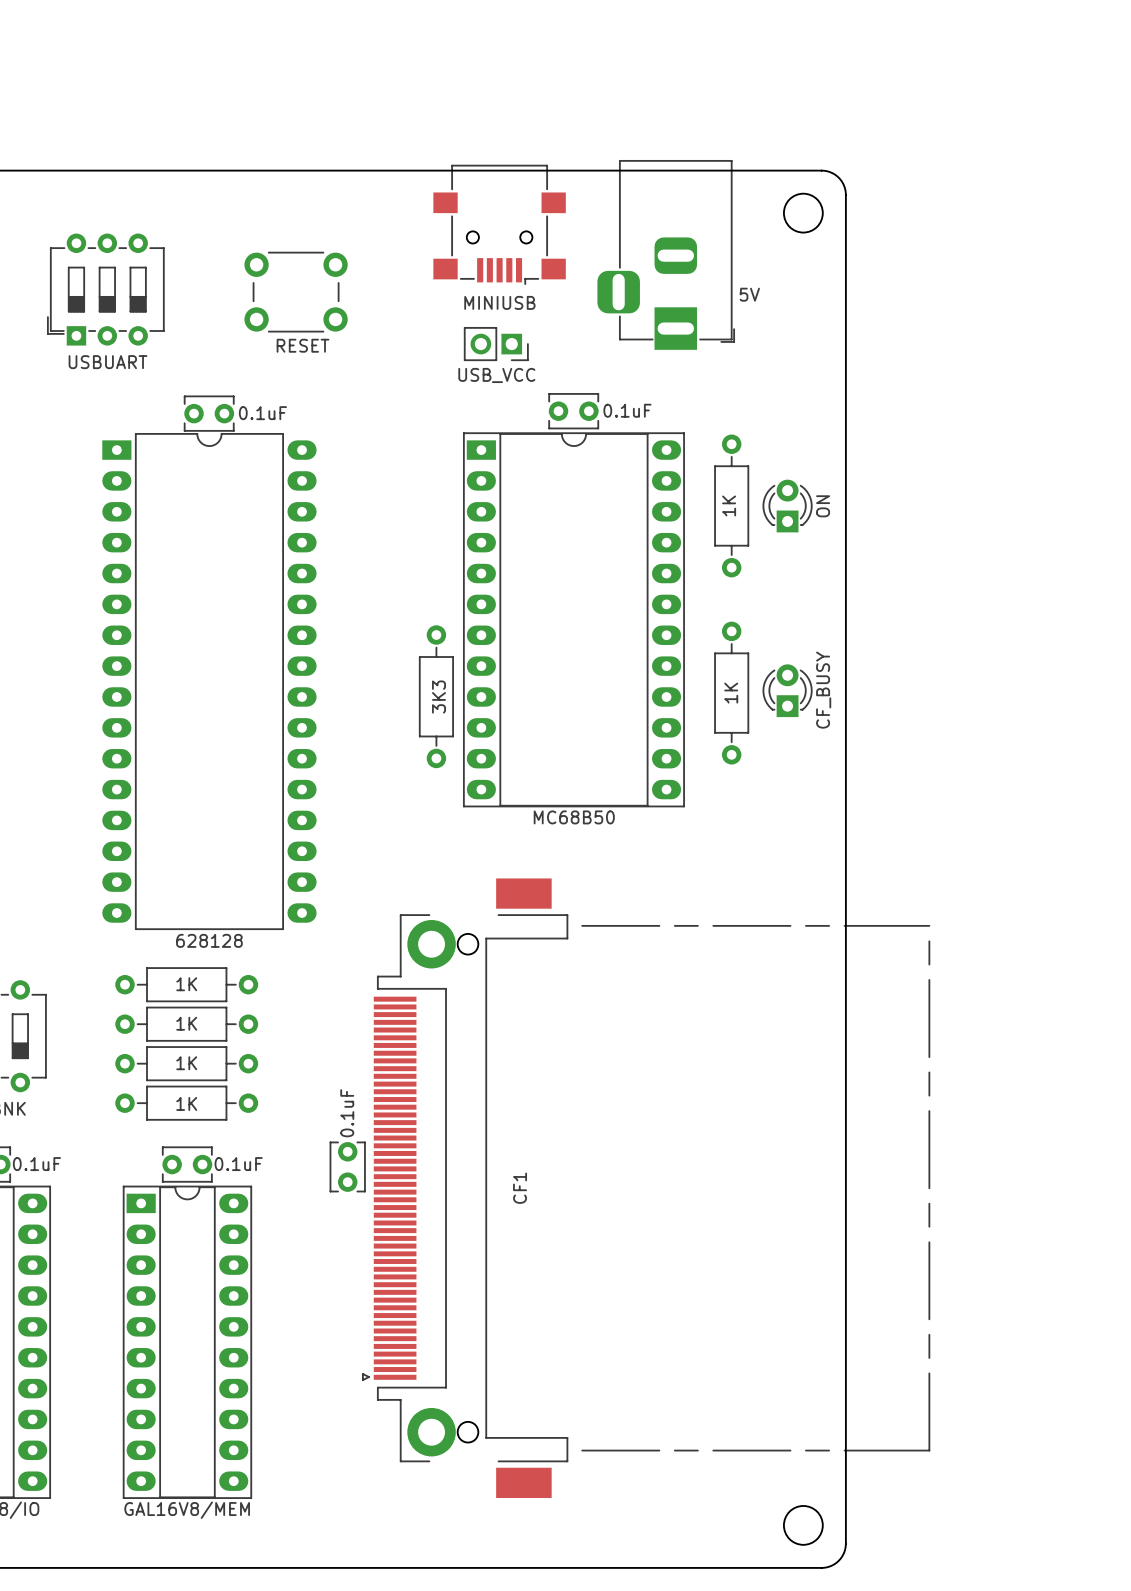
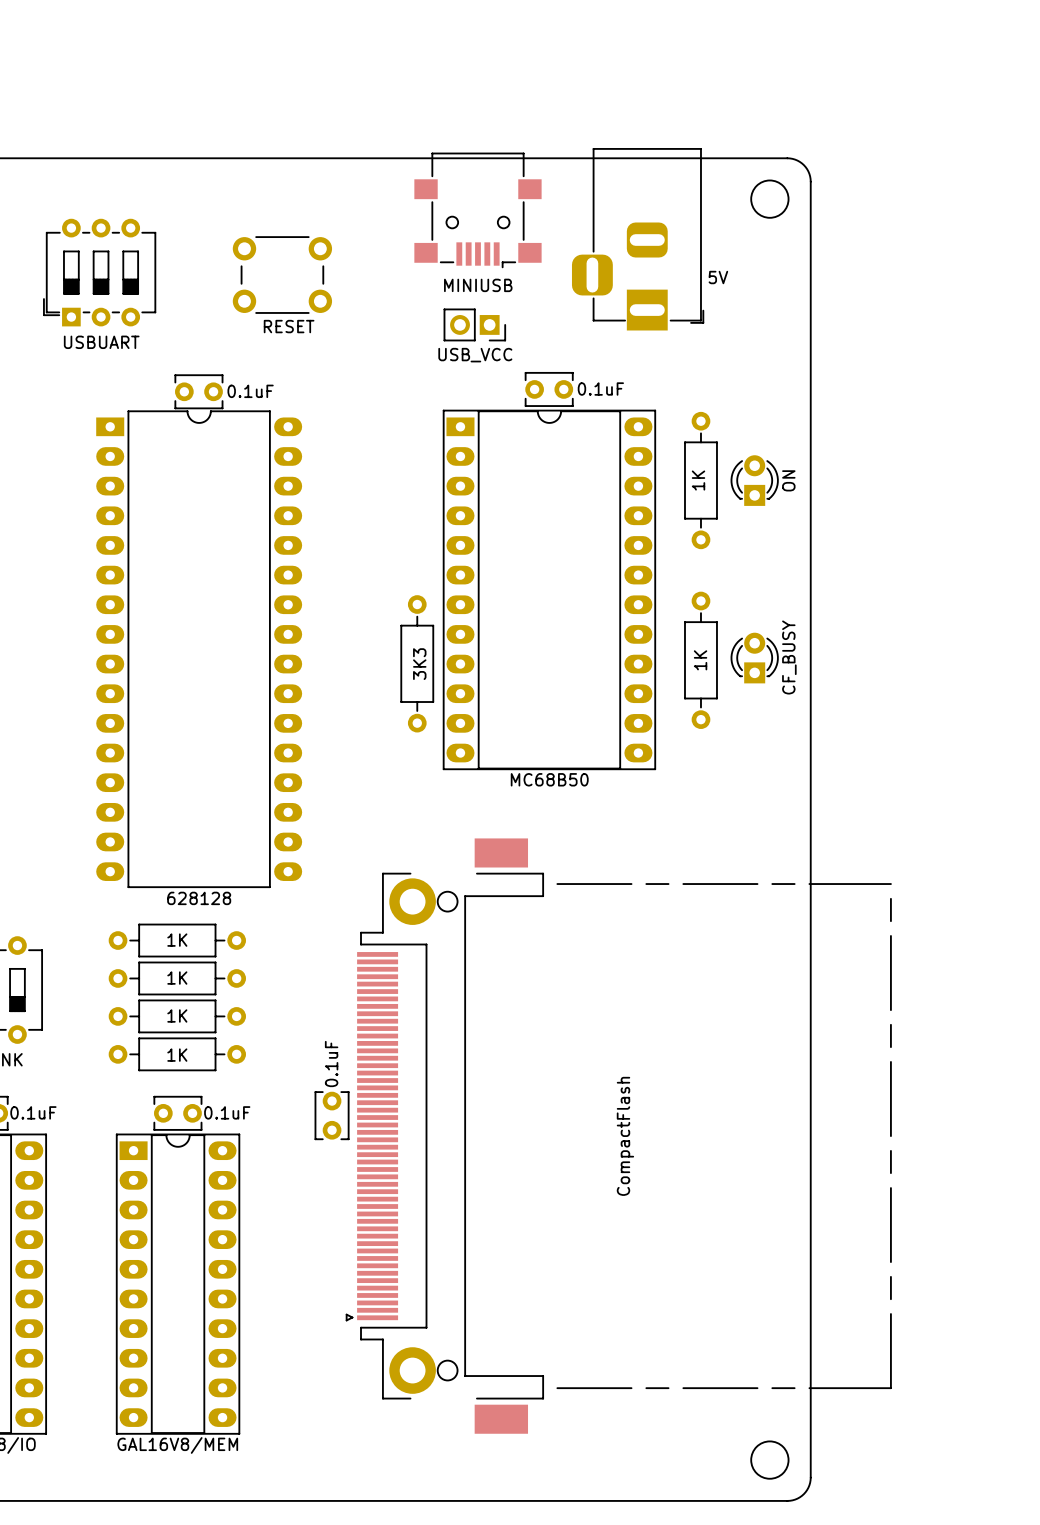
CF1 name: CF1 (520, 1188) -> none
CF1 value: none -> CompactFlash (625, 1136)

